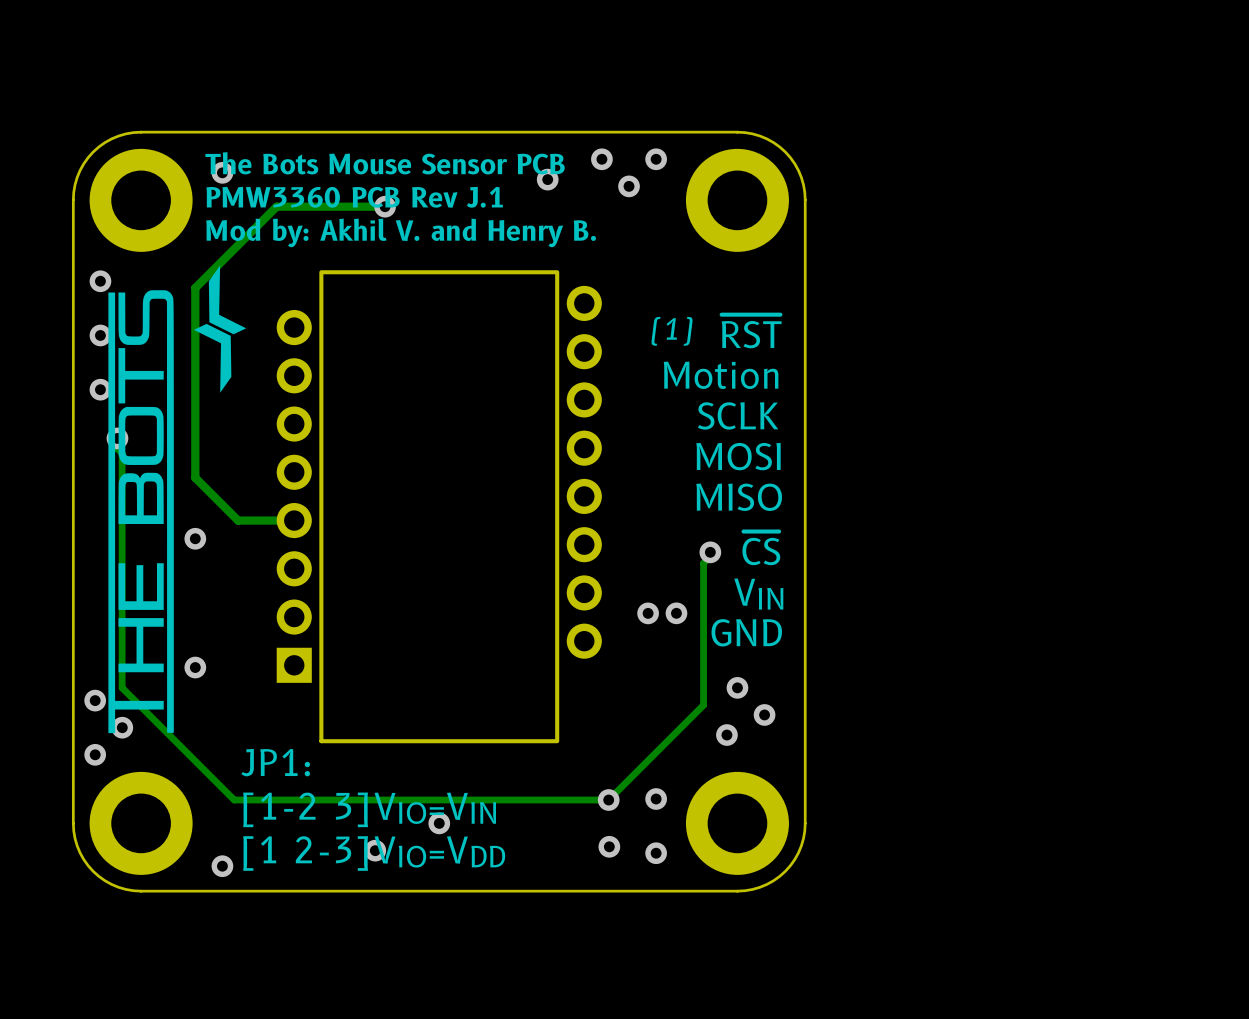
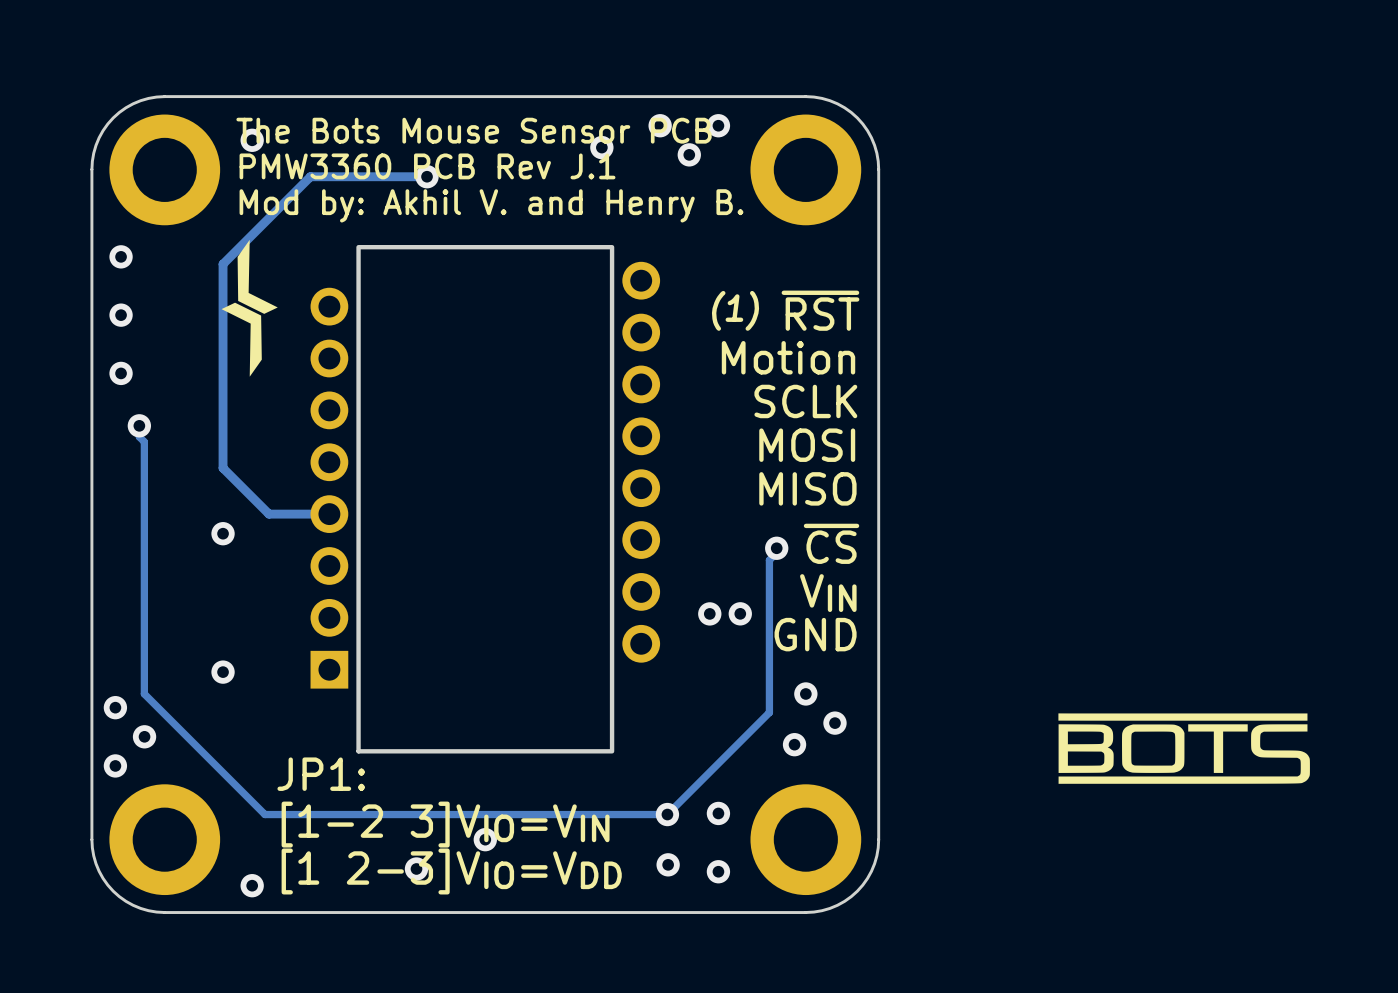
drawing: [108, 290, 174, 734] -> none
drawing: none -> [1058, 713, 1310, 784]

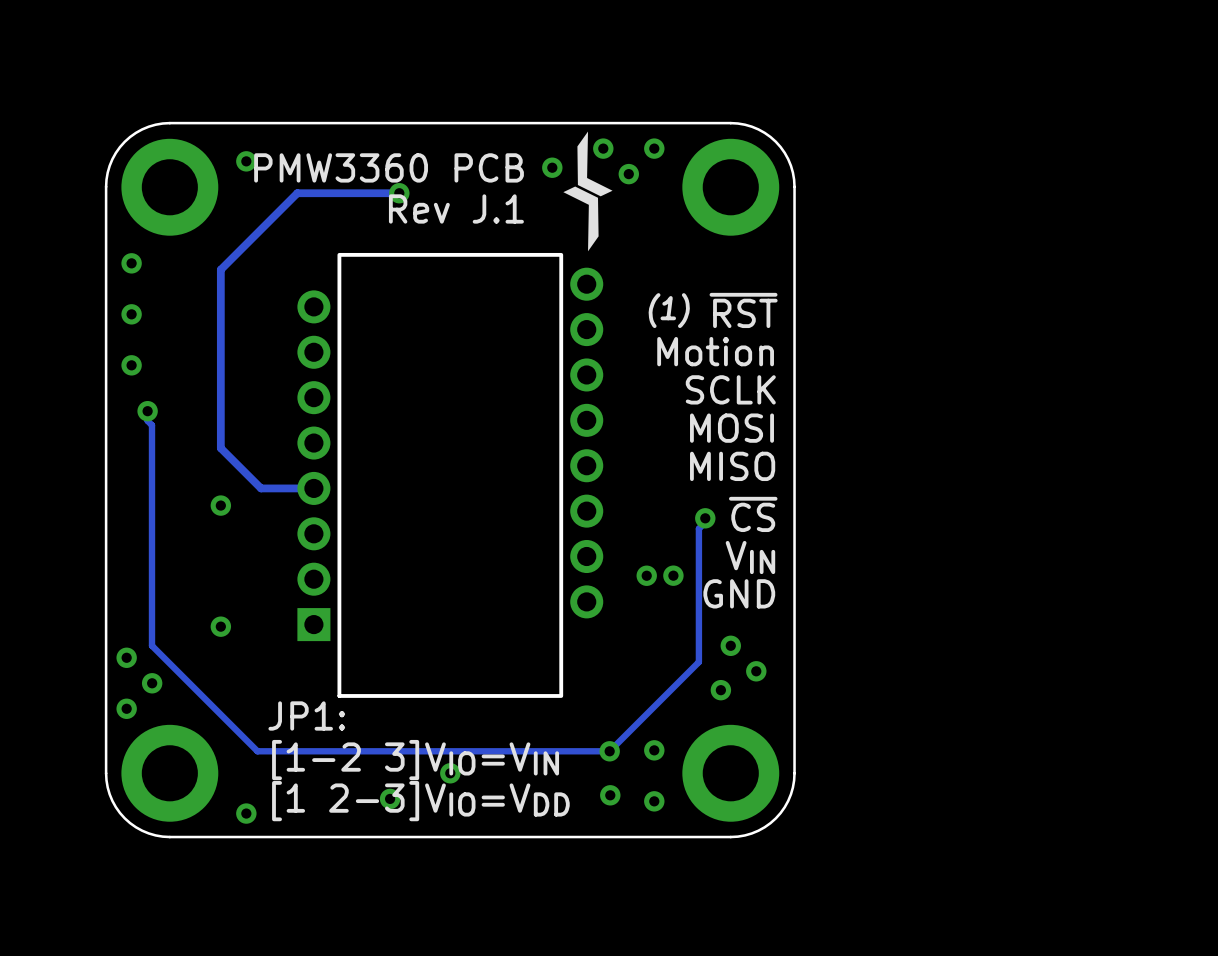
text: The Bots Mouse Sensor PCB (474, 130) -> none
text: PMW3360 PCB Rev J.1 (427, 166) -> PMW3360 PCB (389, 167)
text: none -> Rev J.1 (456, 208)
text: Mod by: Akhil V. and Henry B. (491, 205) -> none
drawing position: (257, 276) -> (594, 163)
drawing position: (241, 339) -> (580, 218)
drawing: [1058, 713, 1310, 784] -> none

